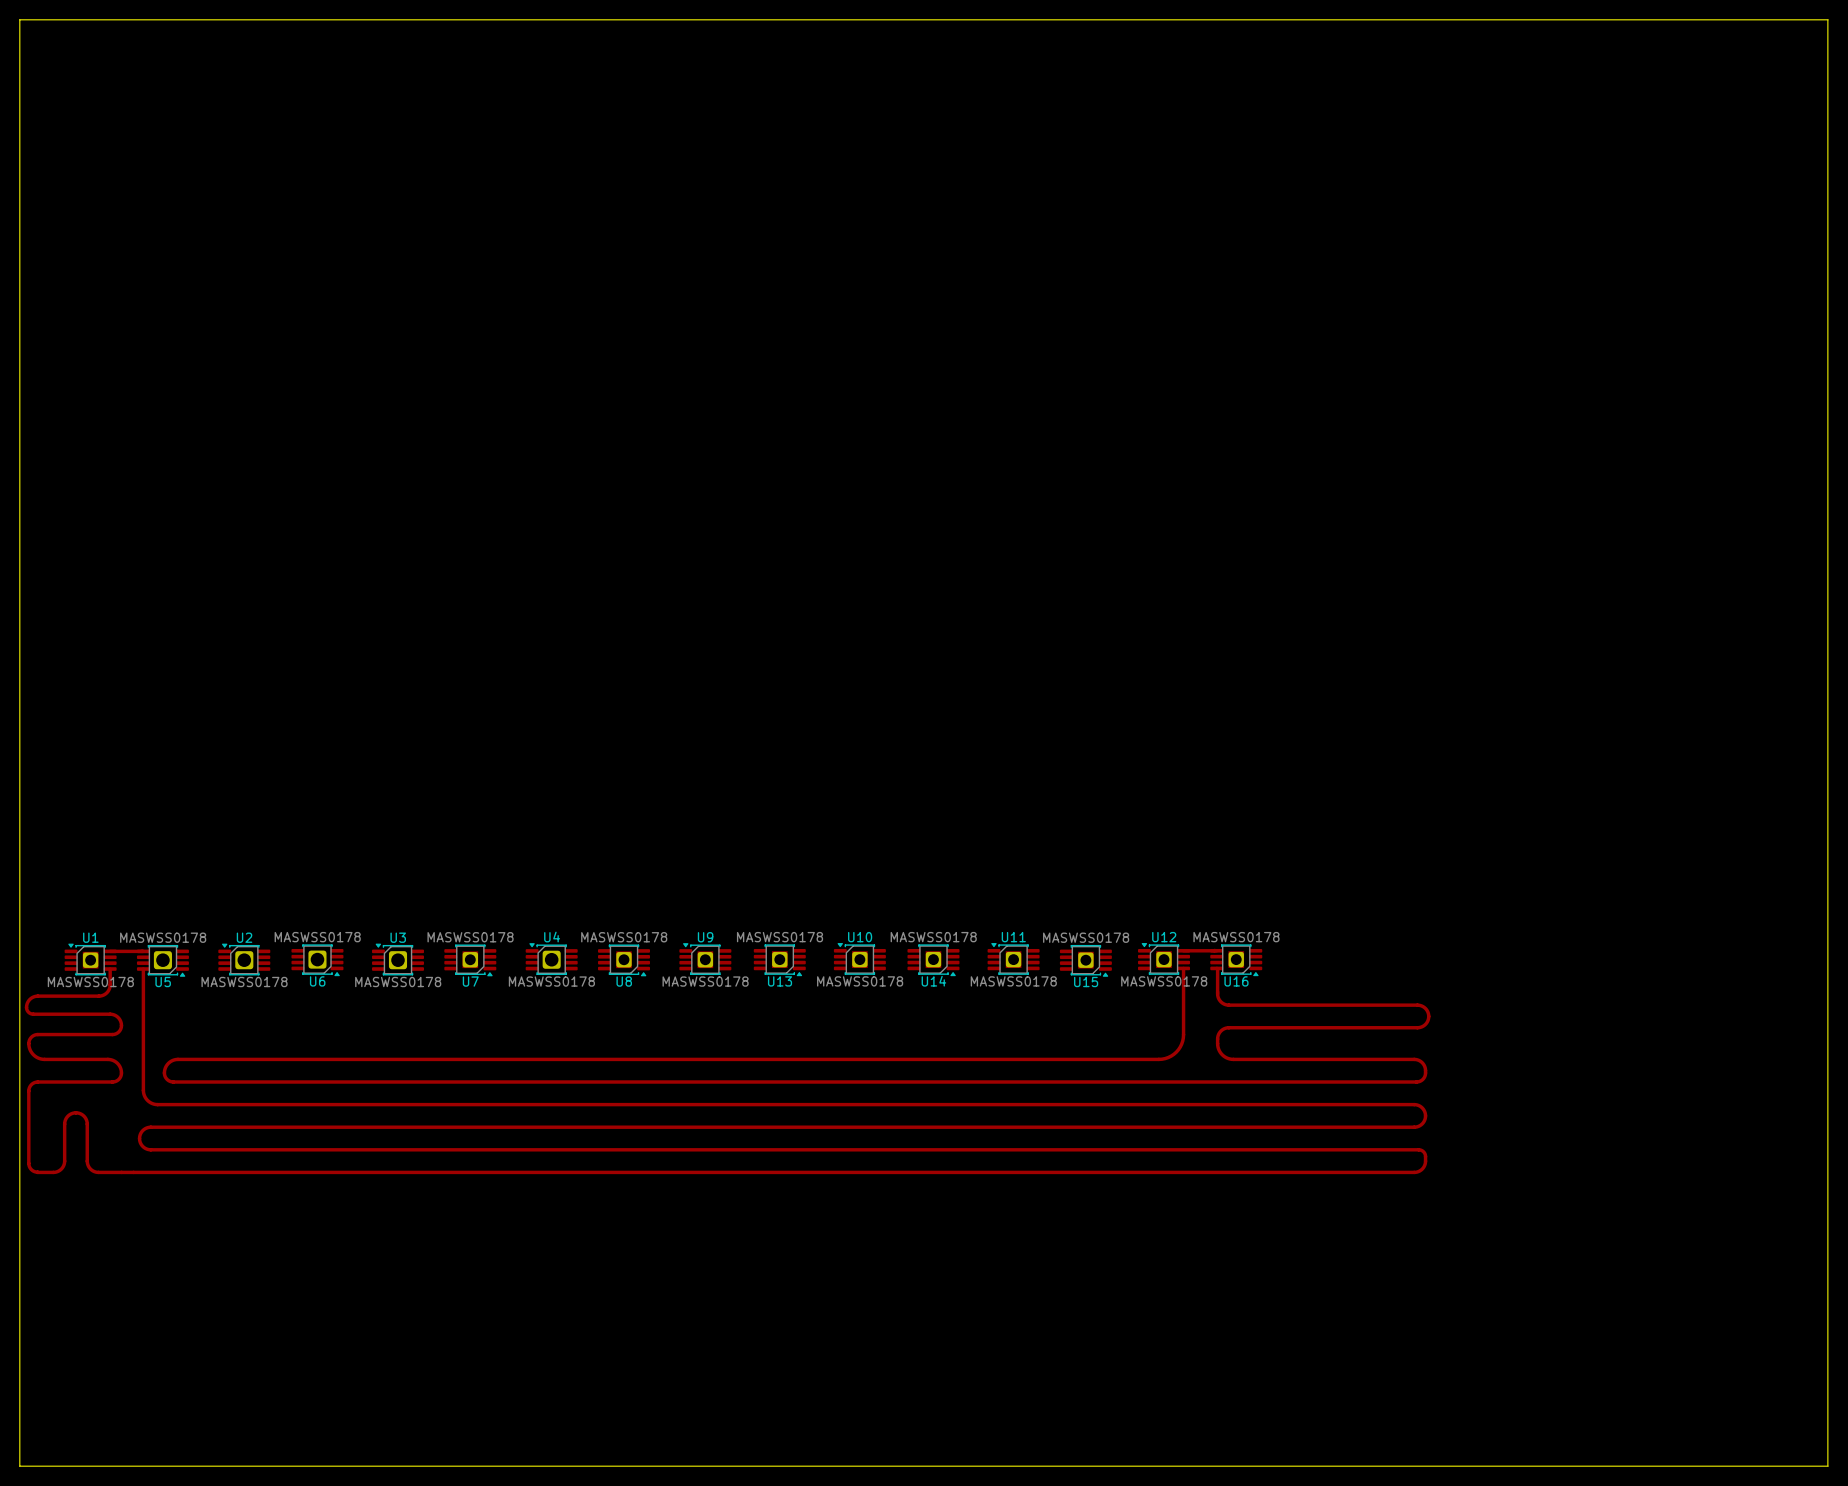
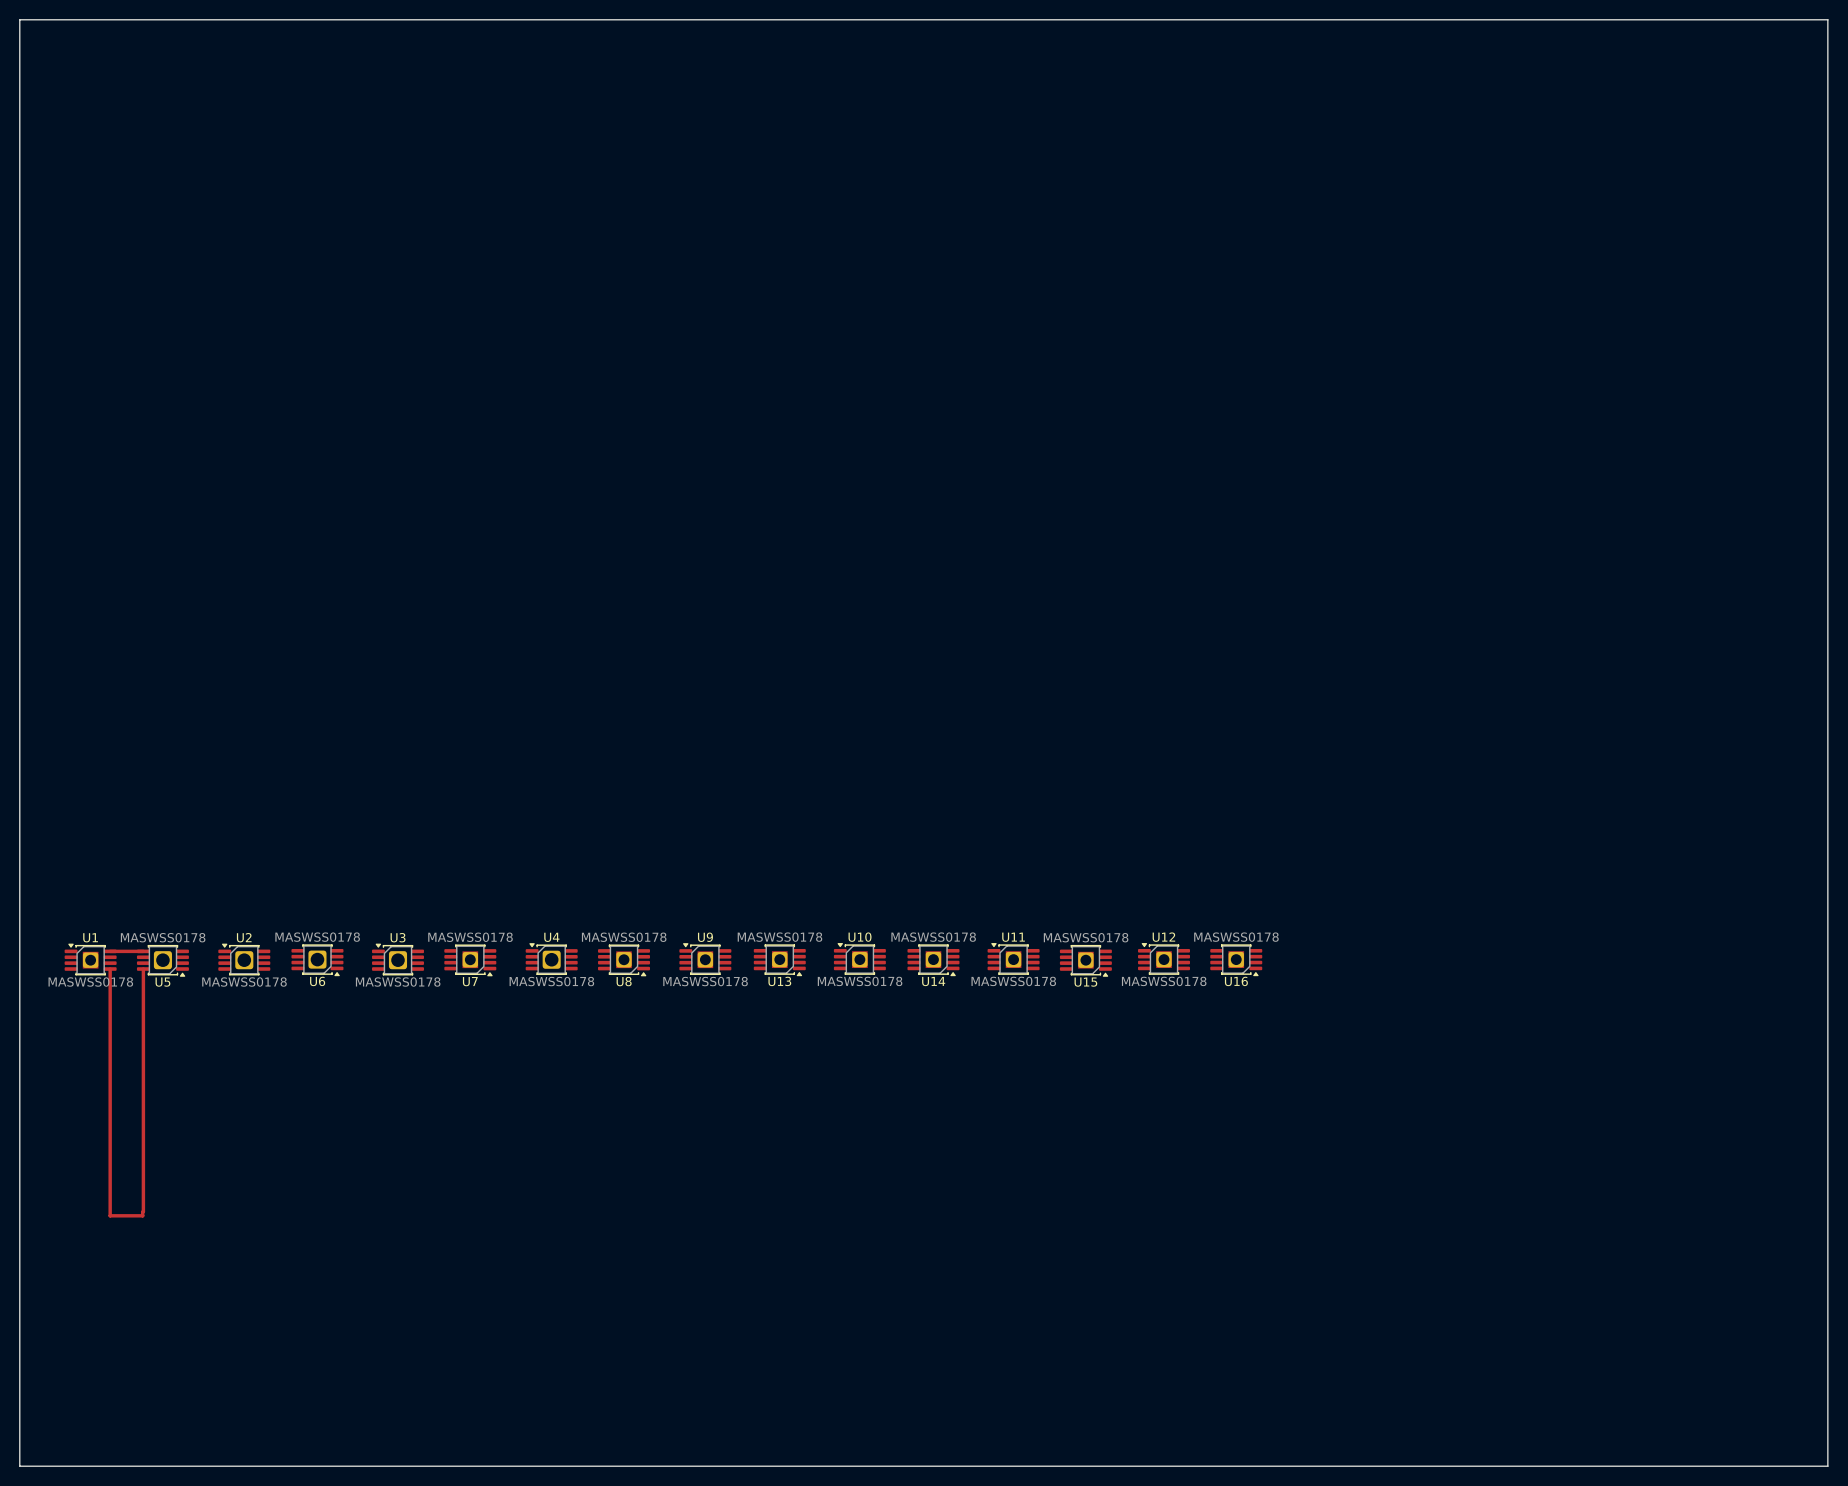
track: (1183, 950) (1216, 950) -> none
track: (1183, 968) (1182, 1041) (1176, 1052) (1162, 1059) (177, 1059) (168, 1063) (164, 1073) (167, 1079) (173, 1082) (1416, 1082) (1424, 1076) (1424, 1065) (1415, 1059) (1233, 1059) (1226, 1057) (1220, 1052) (1217, 1043) (1219, 1033) (1225, 1028) (1417, 1027) (1426, 1023) (1428, 1014) (1425, 1008) (1417, 1005) (1225, 1004) (1220, 1001) (1218, 996) (1216, 968) -> none
track: (110, 984) (107, 991) (101, 995) (36, 996) (30, 998) (27, 1003) (27, 1010) (31, 1013) (111, 1014) (118, 1017) (121, 1025) (119, 1031) (113, 1034) (37, 1034) (30, 1038) (30, 1050) (39, 1058) (109, 1059) (117, 1063) (121, 1072) (119, 1078) (113, 1081) (37, 1082) (30, 1085) (28, 1091) (28, 1163) (34, 1171) (54, 1172) (62, 1167) (64, 1161) (65, 1121) (69, 1115) (75, 1112) (82, 1115) (86, 1119) (87, 1164) (91, 1170) (98, 1172) (1414, 1172) (1422, 1169) (1425, 1161) (1424, 1153) (1418, 1149) (150, 1149) (142, 1146) (139, 1138) (142, 1130) (150, 1127) (1414, 1127) (1422, 1123) (1425, 1115) (1422, 1107) (1414, 1104) (157, 1104) (147, 1100) (143, 1090) -> (110, 984) (110, 1215) (142, 1215) (143, 1090)

